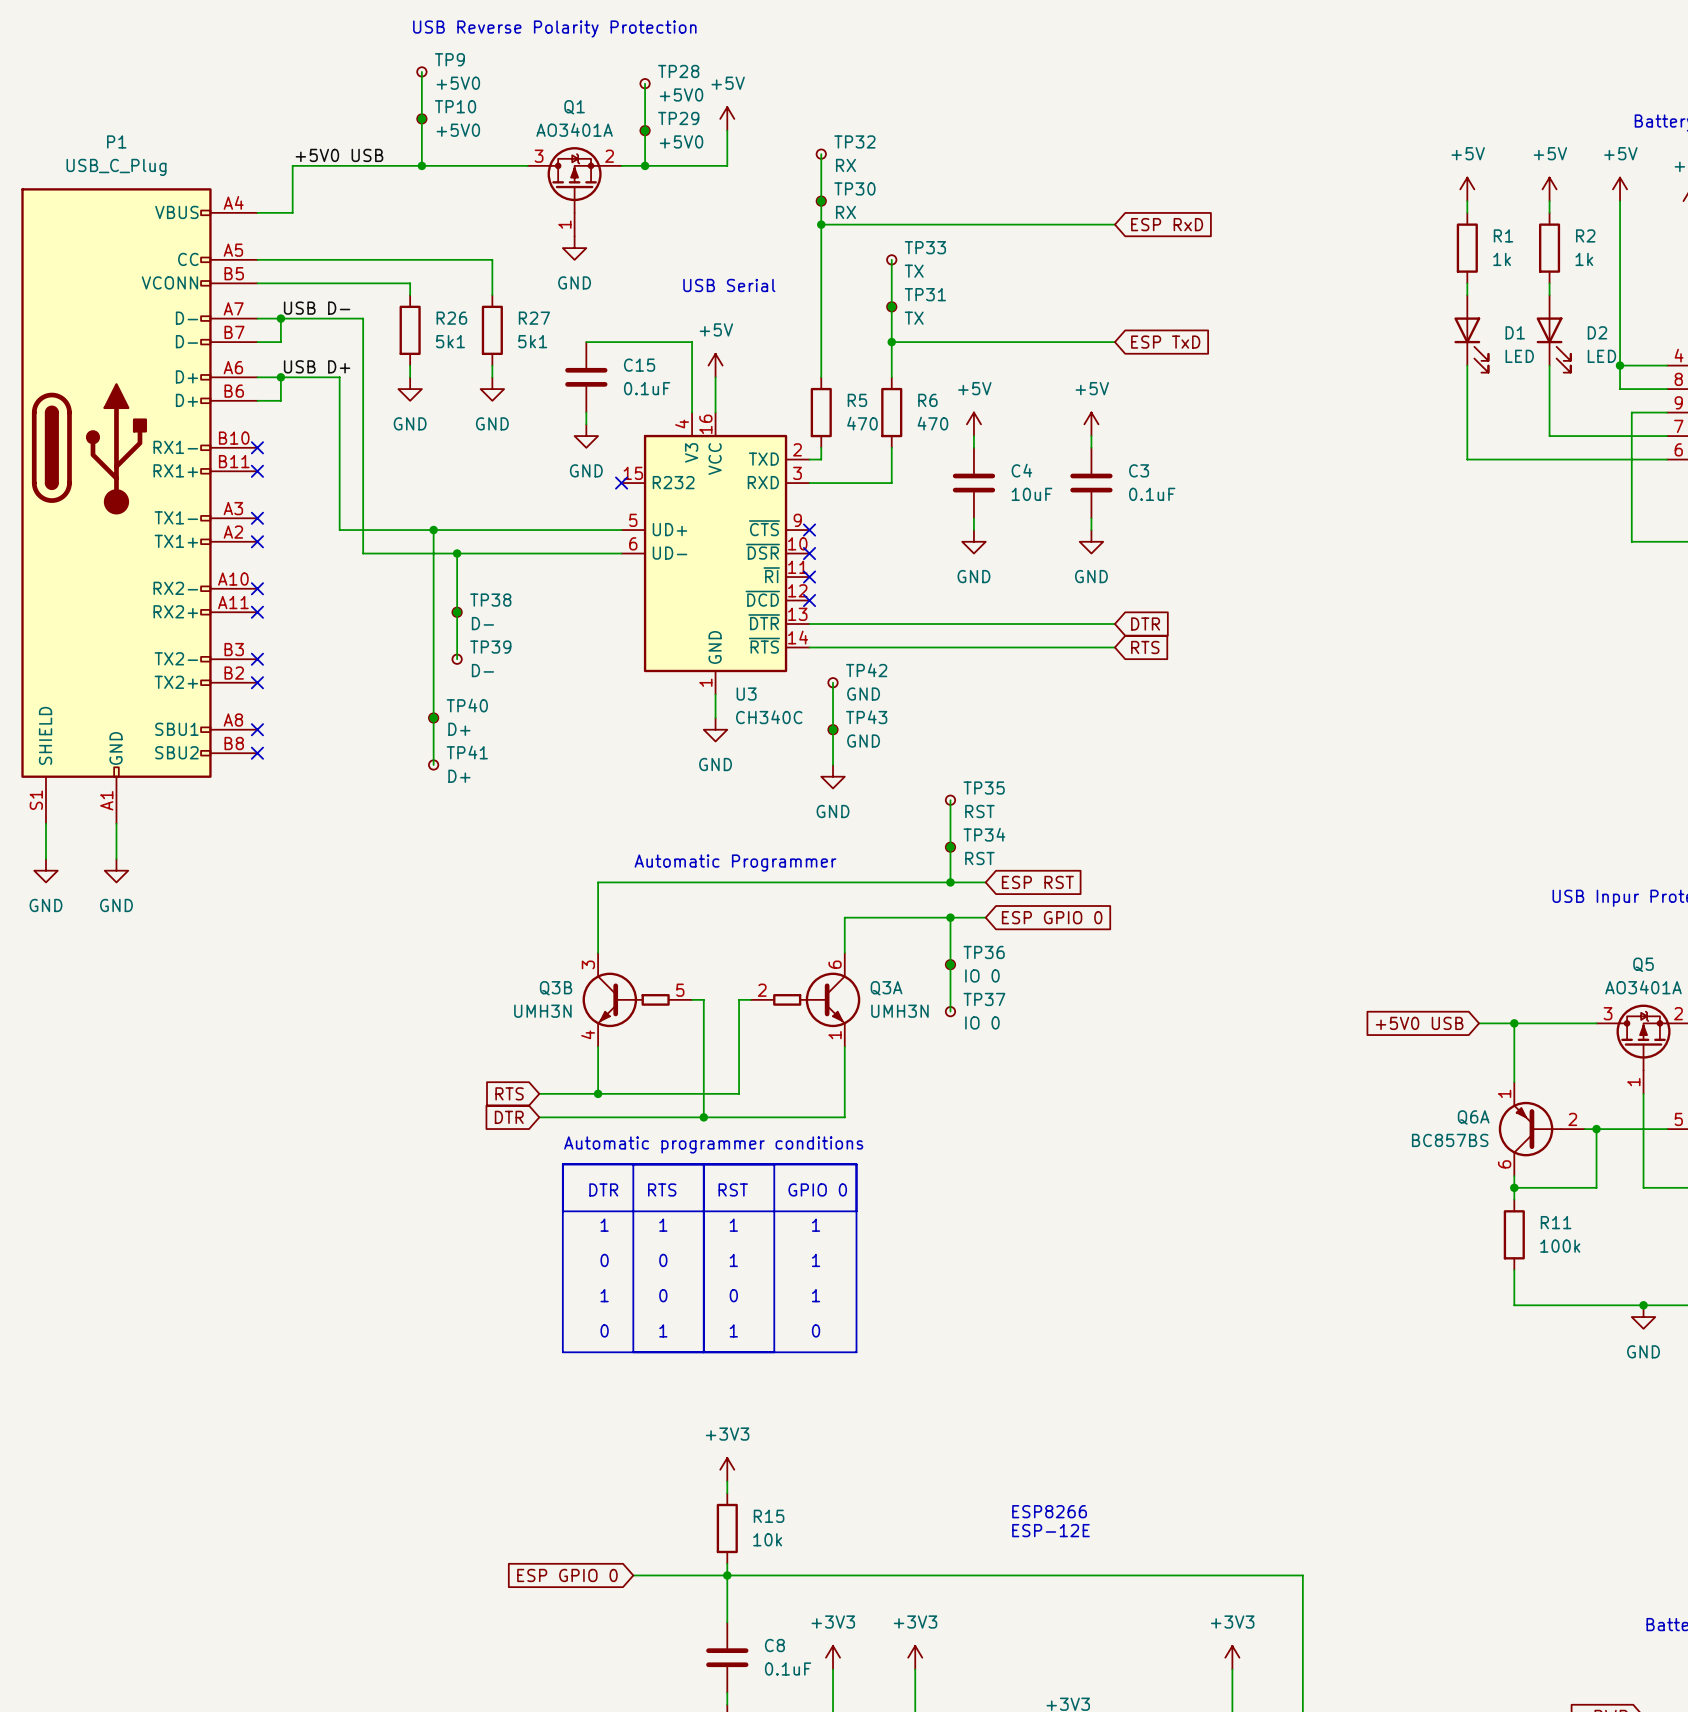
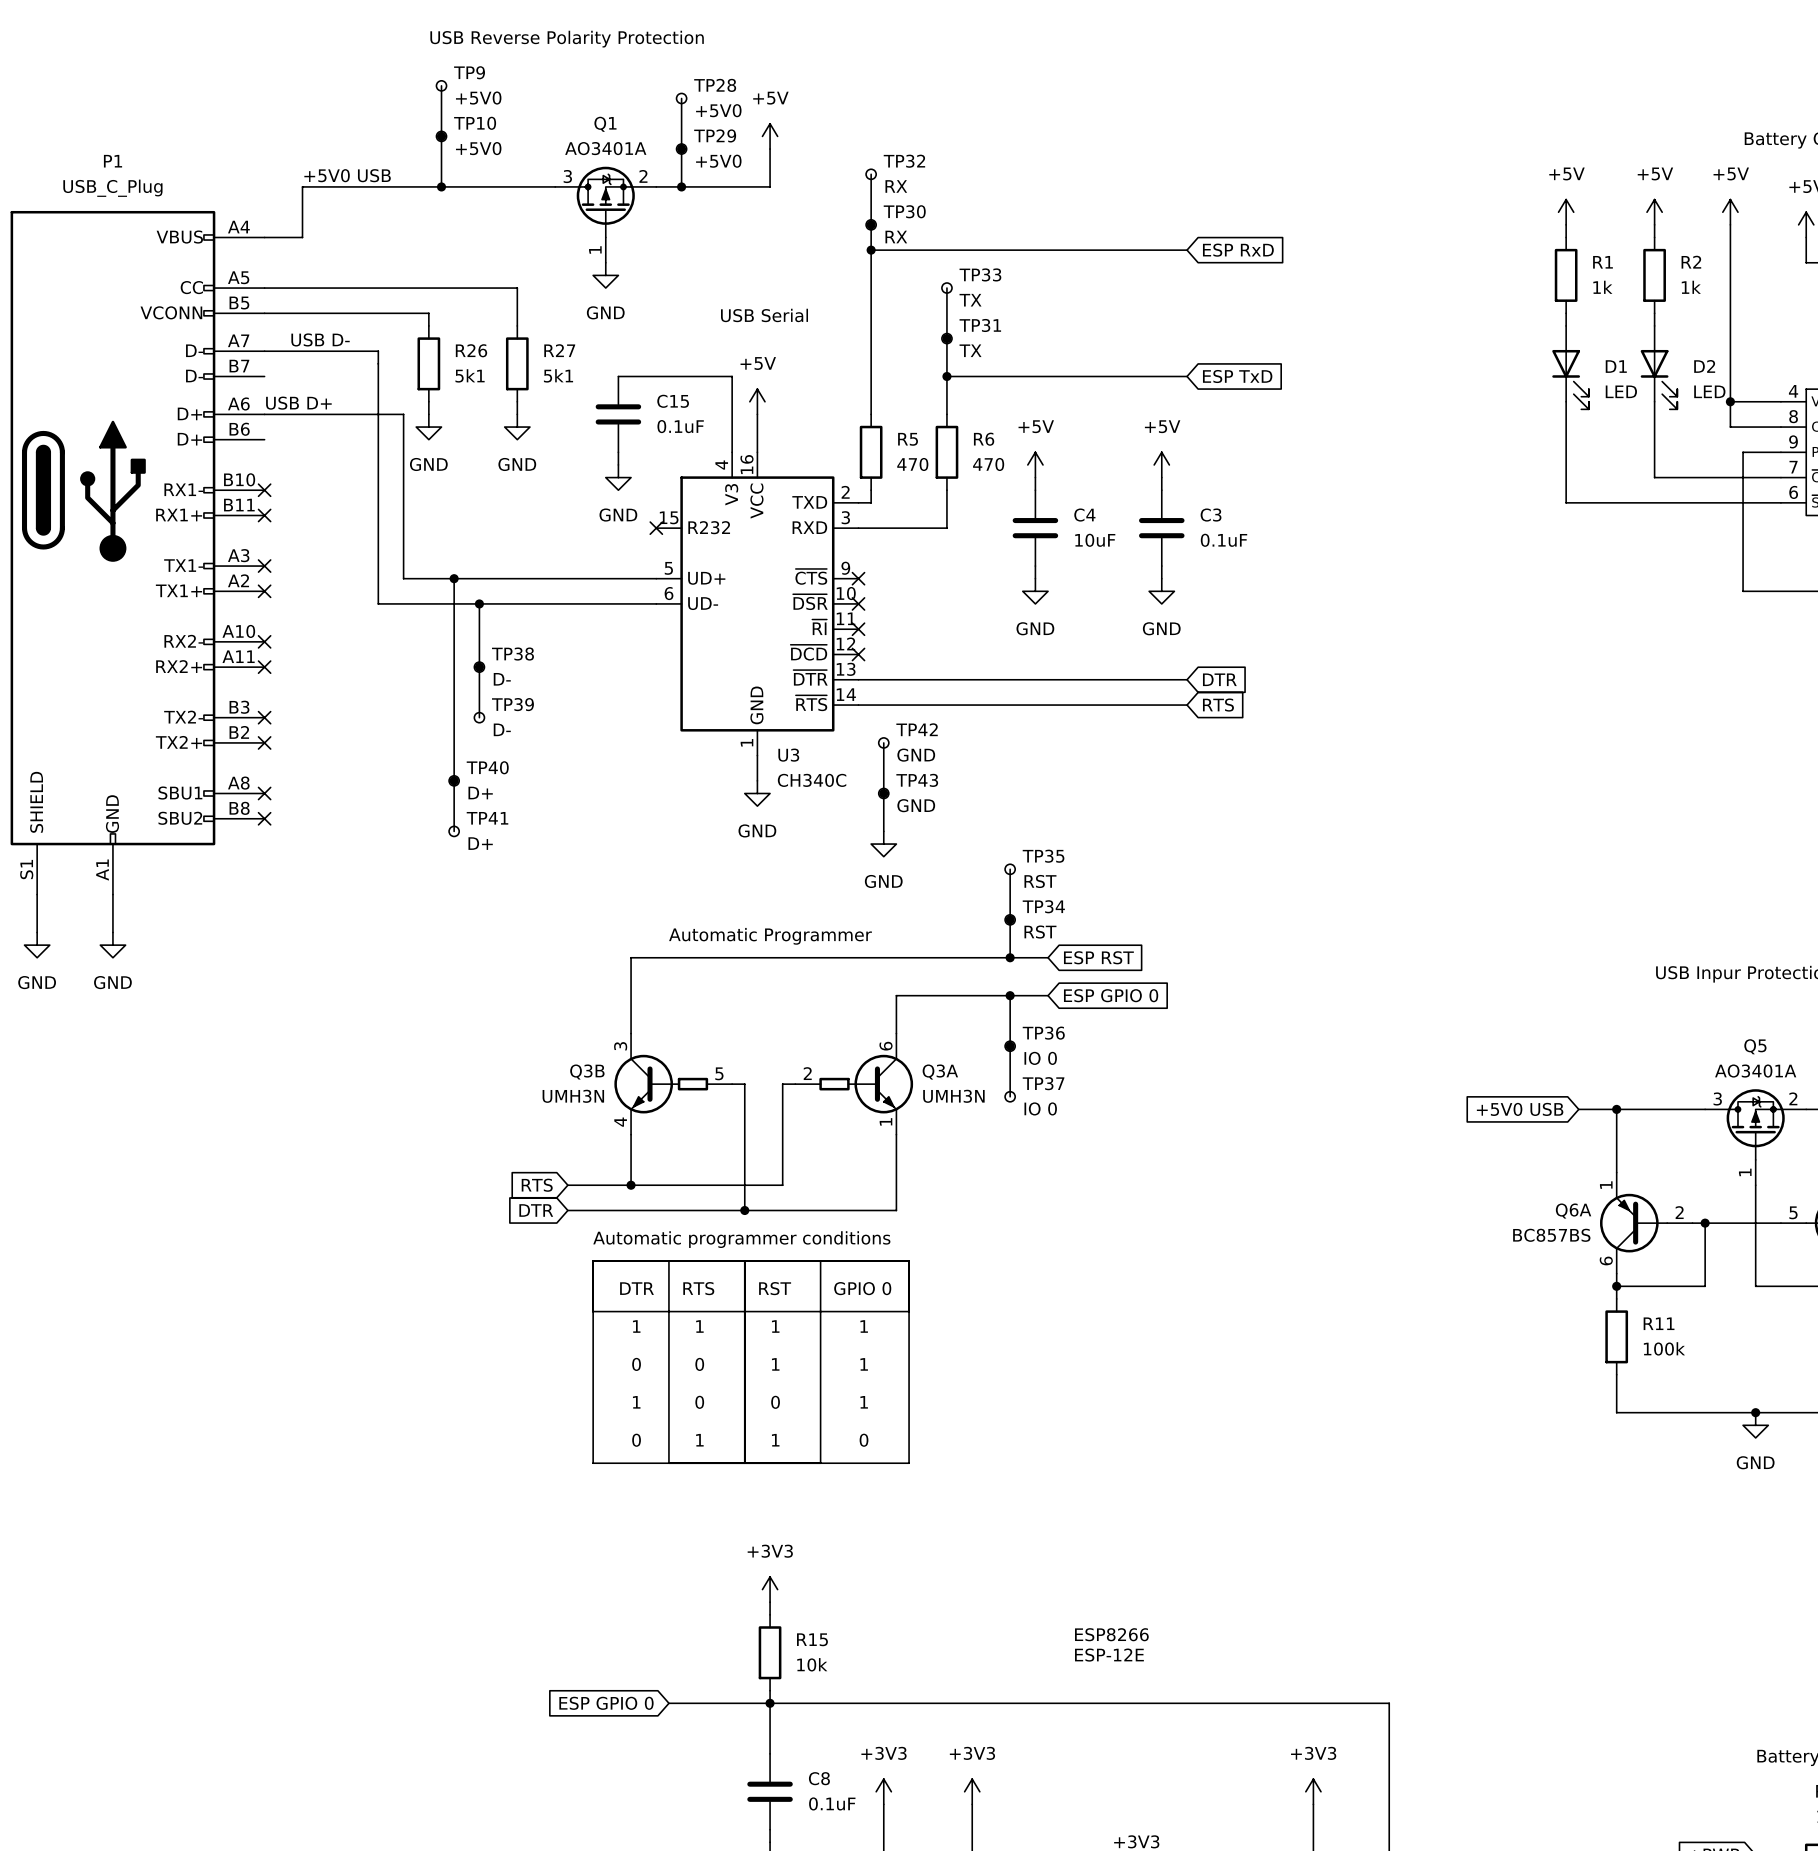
wire: (280, 318) (280, 342) (257, 342) -> none
junction: (280, 318) -> none
label position: USB D+ (317, 366) -> USB D+ (298, 403)
wire: (280, 377) (280, 400) (257, 400) -> none
junction: (280, 377) -> none
wire: (339, 377) (339, 530) (386, 530) -> (353, 414) (403, 414) (403, 578)

